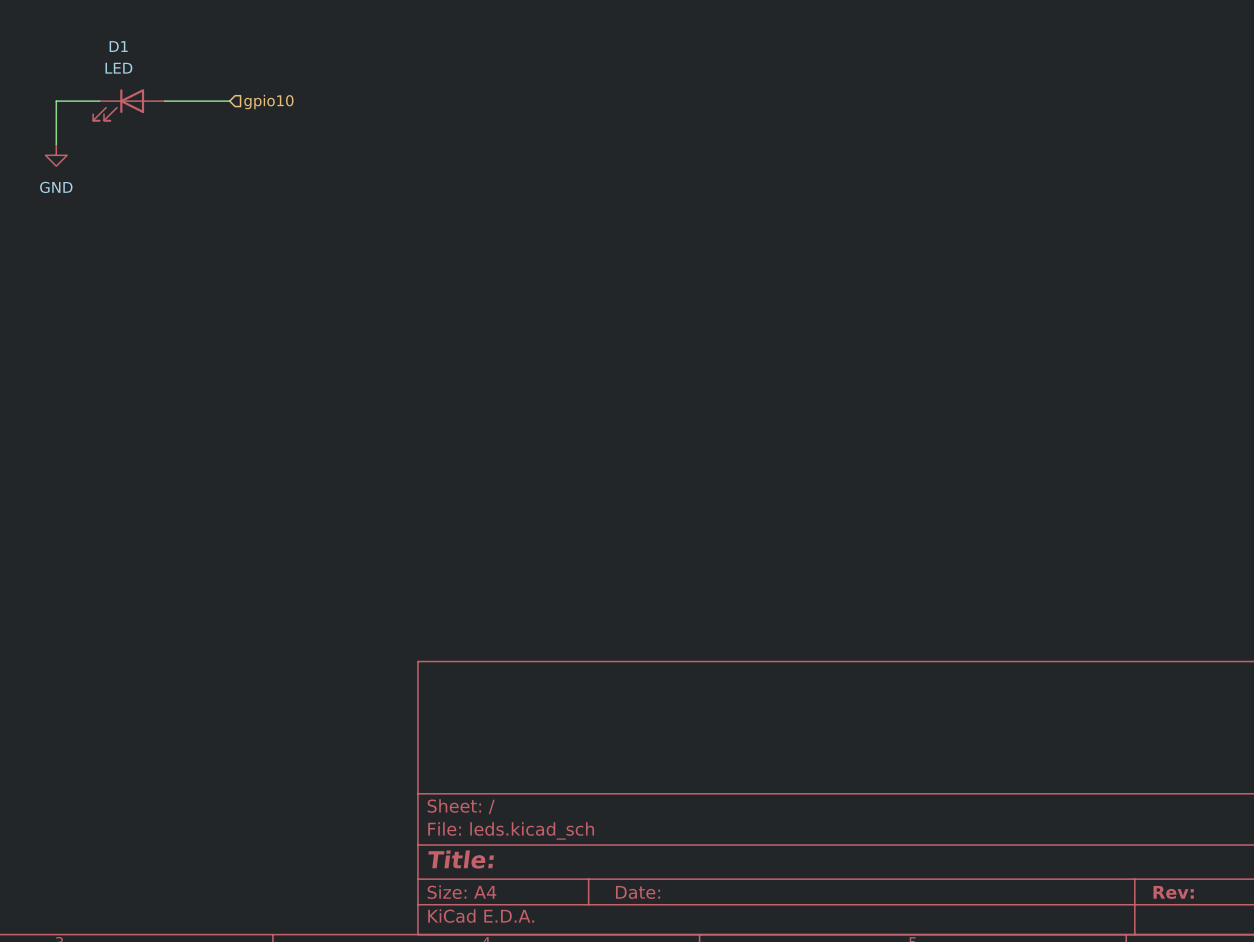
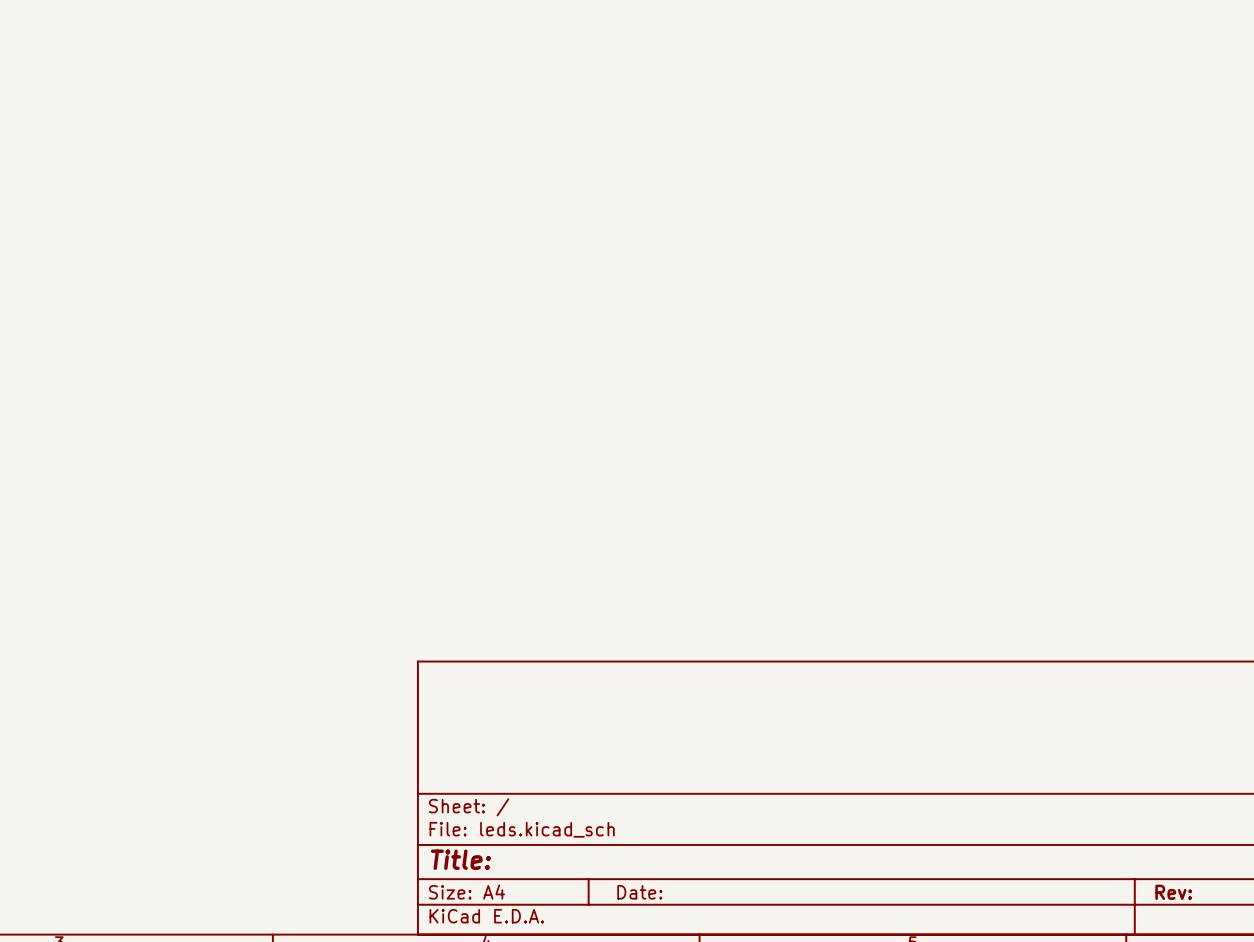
wire: (99, 101) (56, 101) (56, 144) -> none
wire: (164, 101) (229, 101) -> none
hierarchical label: gpio10 (268, 102) -> none
D1: LED (128, 104) -> none
power symbol: GND (56, 155) -> none

